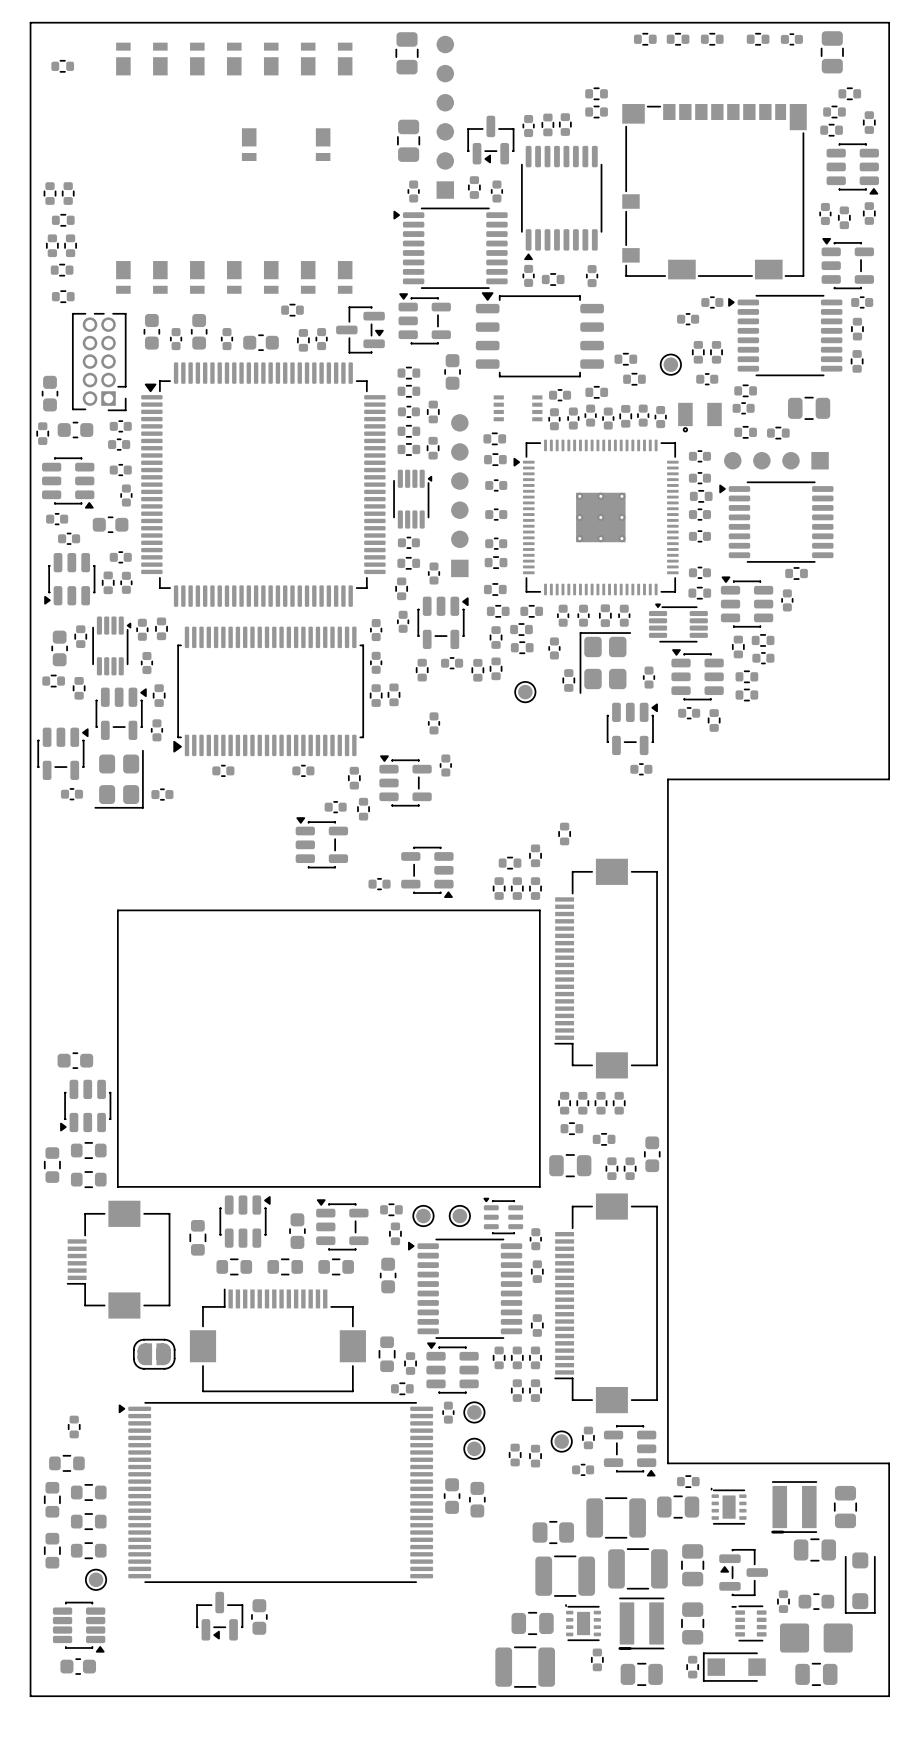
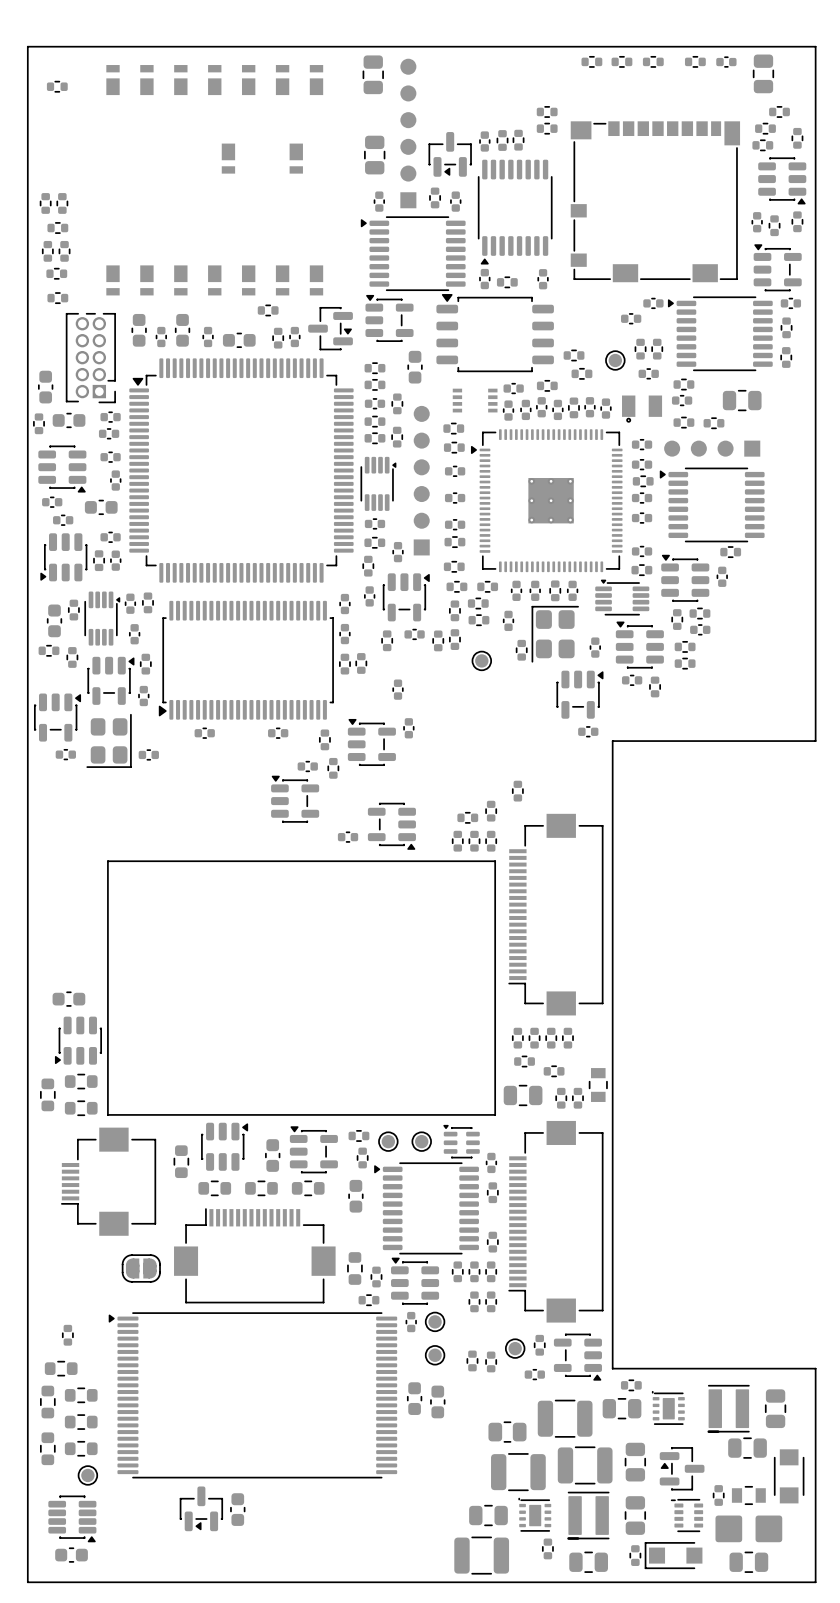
part footprint: [643, 1136, 661, 1173] -> [588, 1068, 608, 1102]
part footprint: [844, 1552, 876, 1614] -> [773, 1449, 805, 1504]
part footprint: [798, 1593, 835, 1610] -> [731, 1486, 766, 1505]

